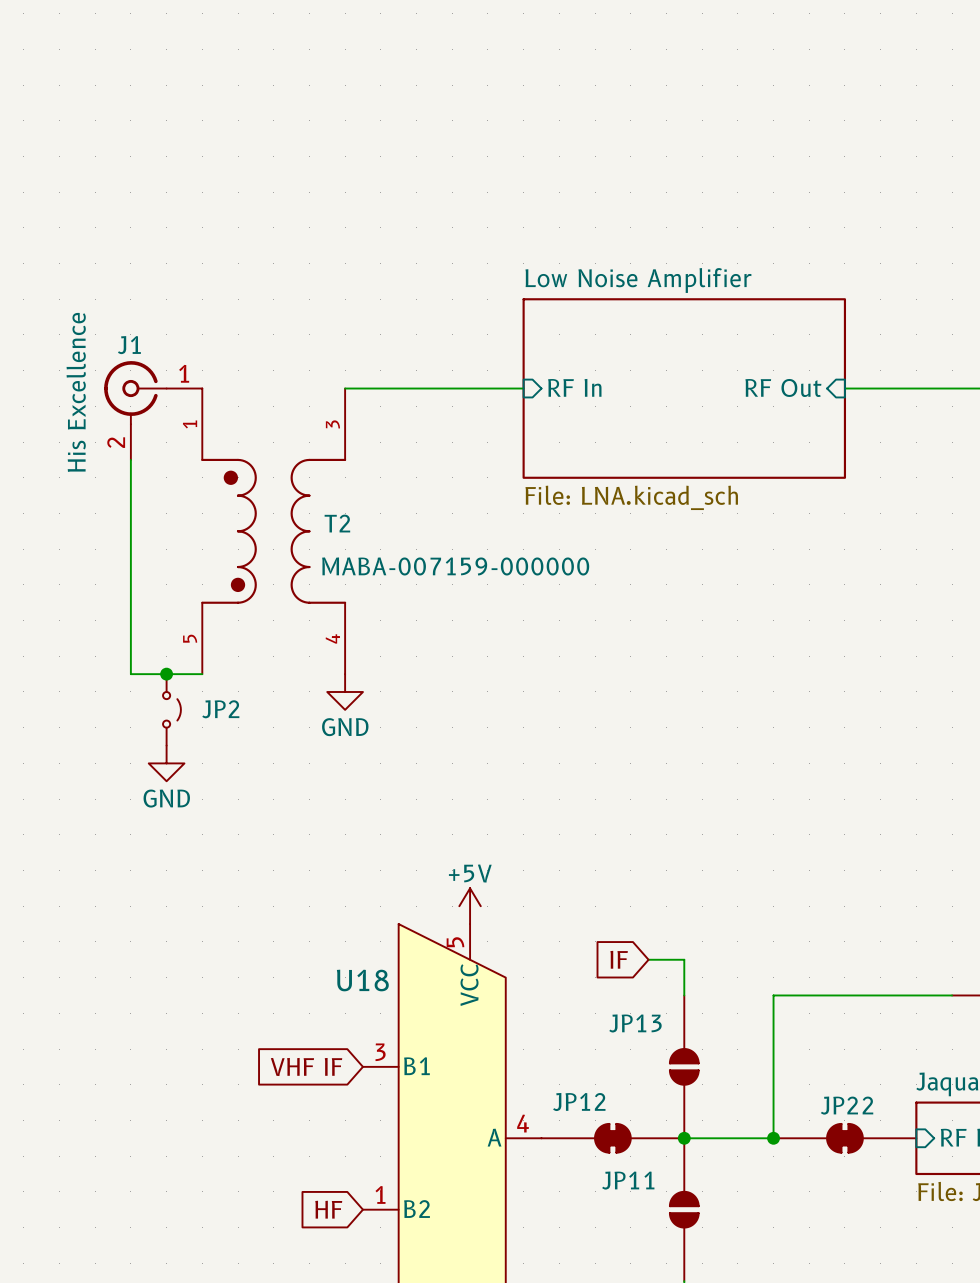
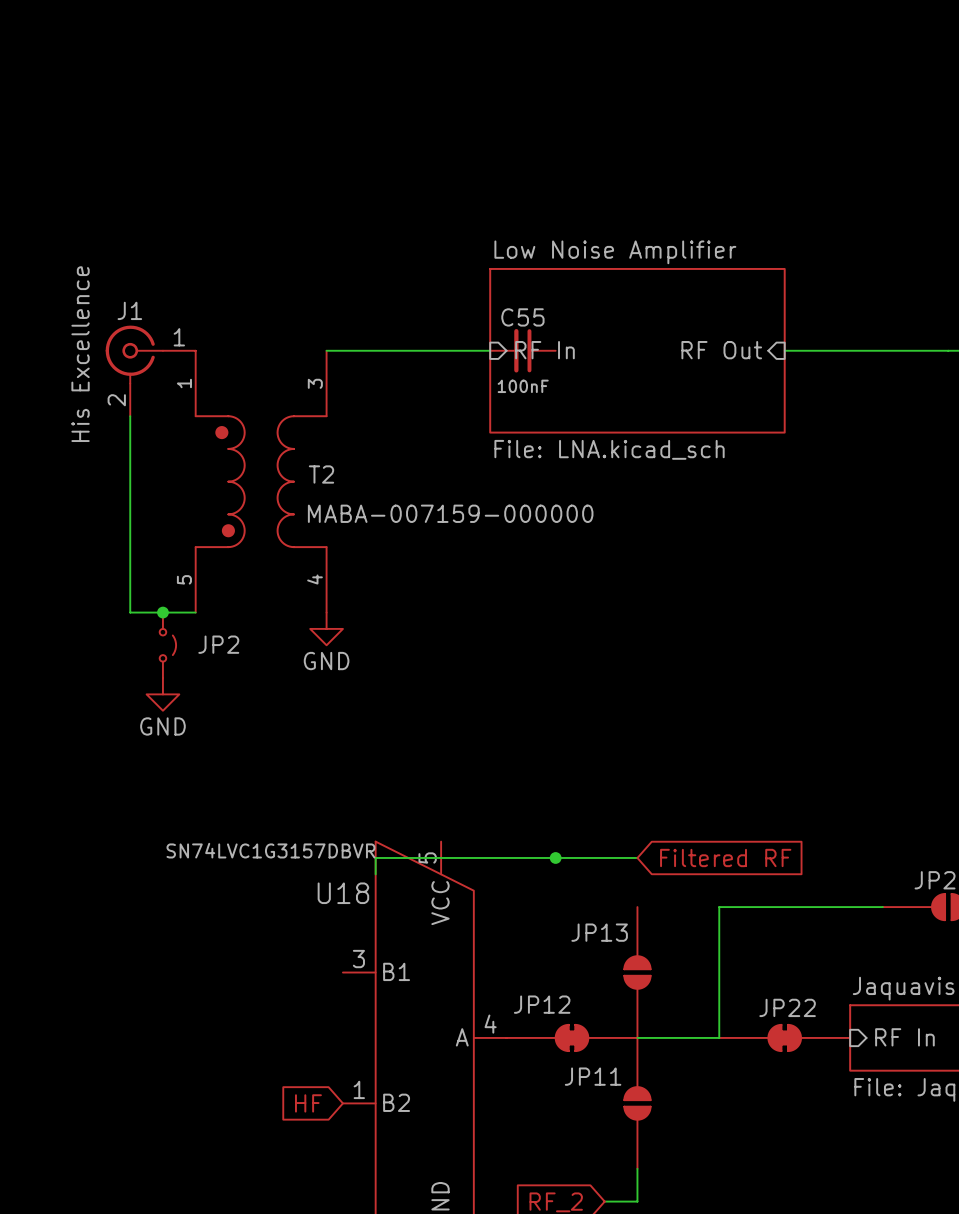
C55: none -> 100nF (522, 350)
power symbol: +5V (470, 906) -> none
U18 value: none -> SN74LVC1G3157DBVR (270, 850)
junction: none -> (555, 857)
wire: none -> (637, 857) (375, 857) (375, 874)
global label: none -> Filtered RF (725, 857)
global label: IF (619, 959) -> none
wire: (648, 959) (684, 959) (684, 995) -> none
global label: VHF IF (306, 1066) -> none
junction: (684, 1138) -> none
junction: (773, 1138) -> none

